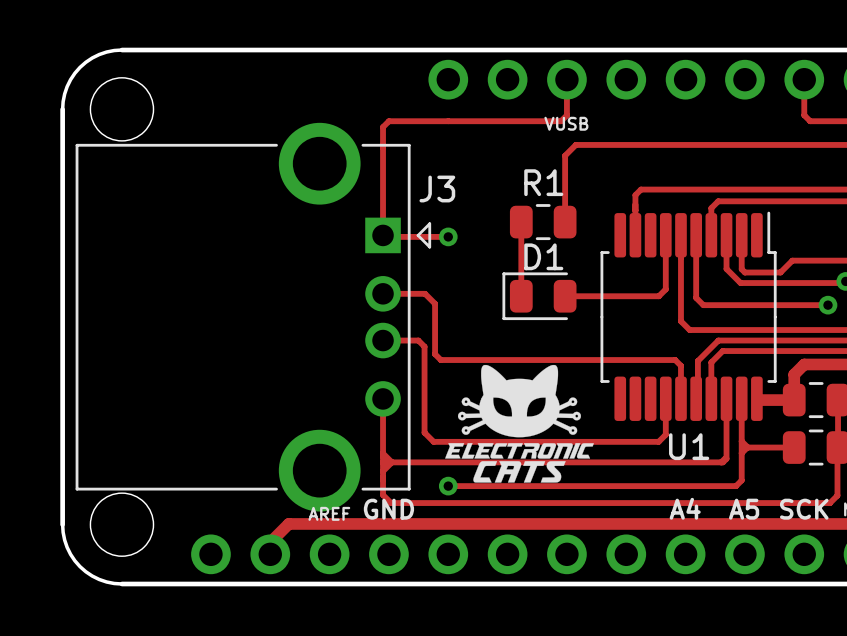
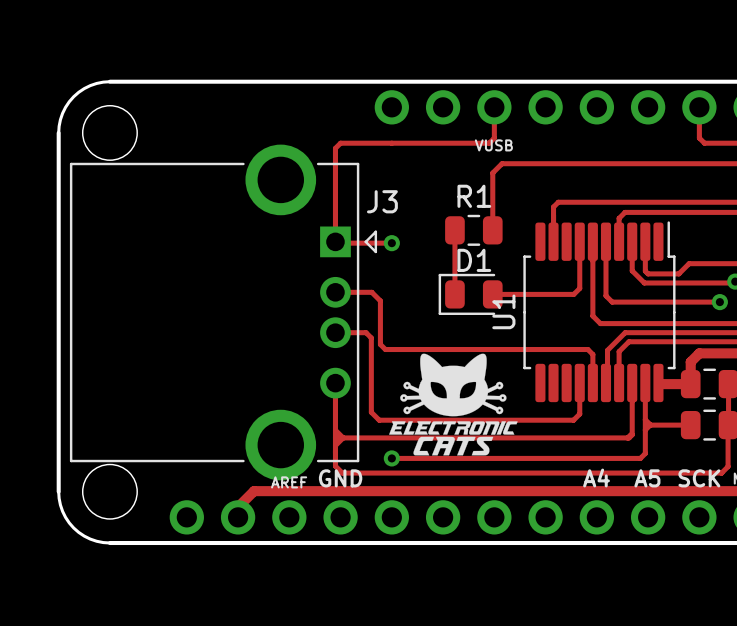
U1 name rotation: 0° (689, 446) -> 90° counterclockwise (503, 311)
U1 name position: U1 (689, 446) -> U1 (503, 311)

